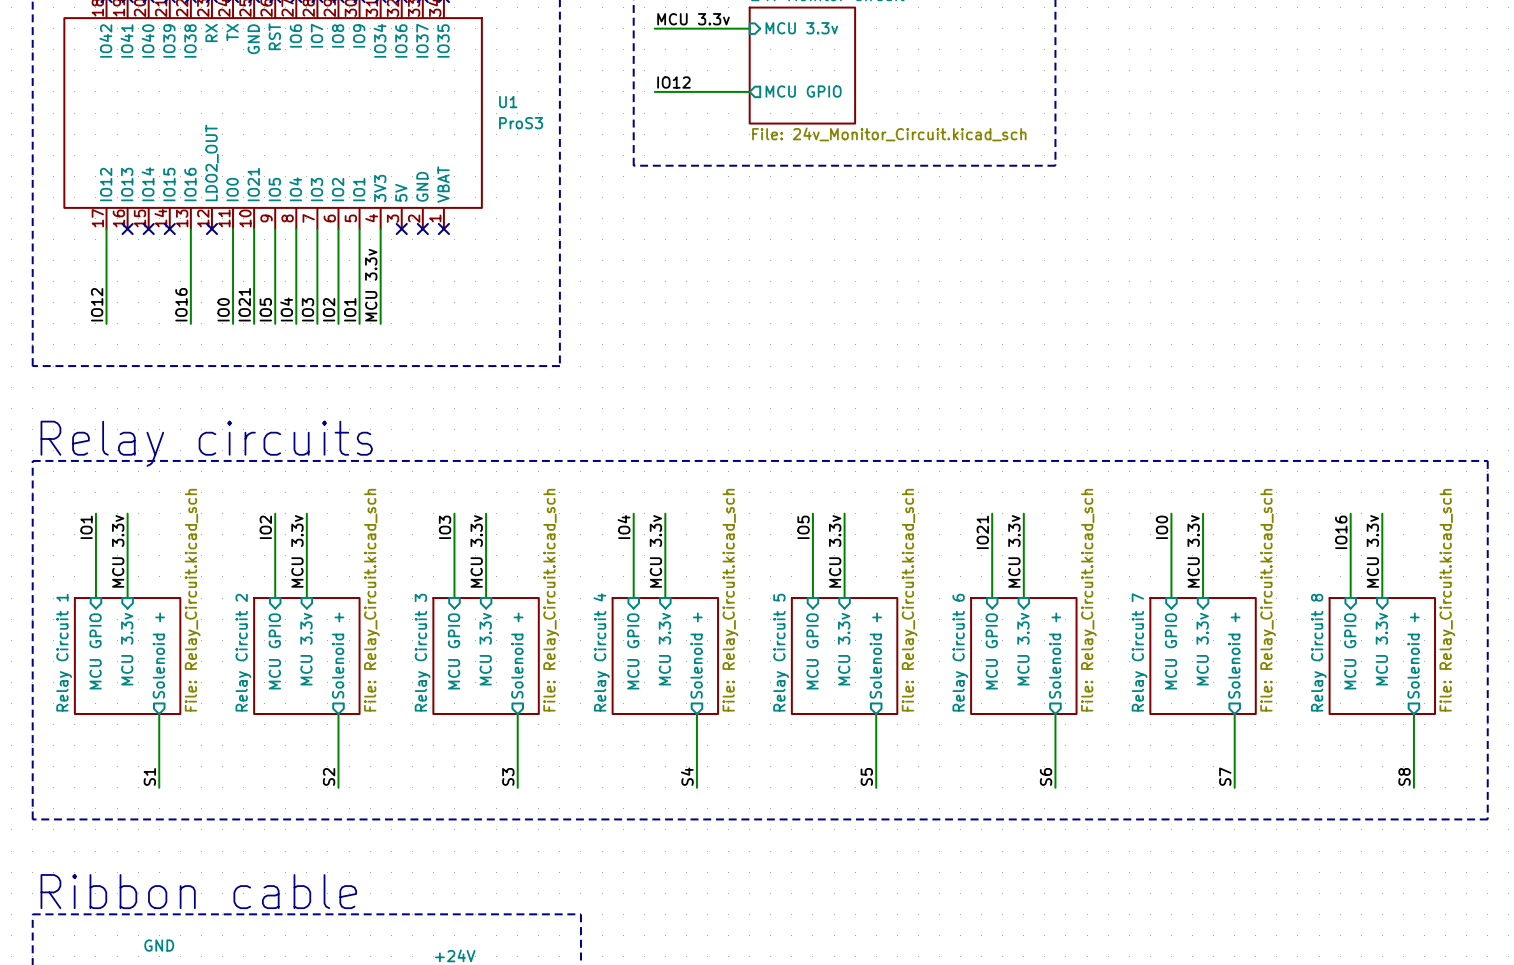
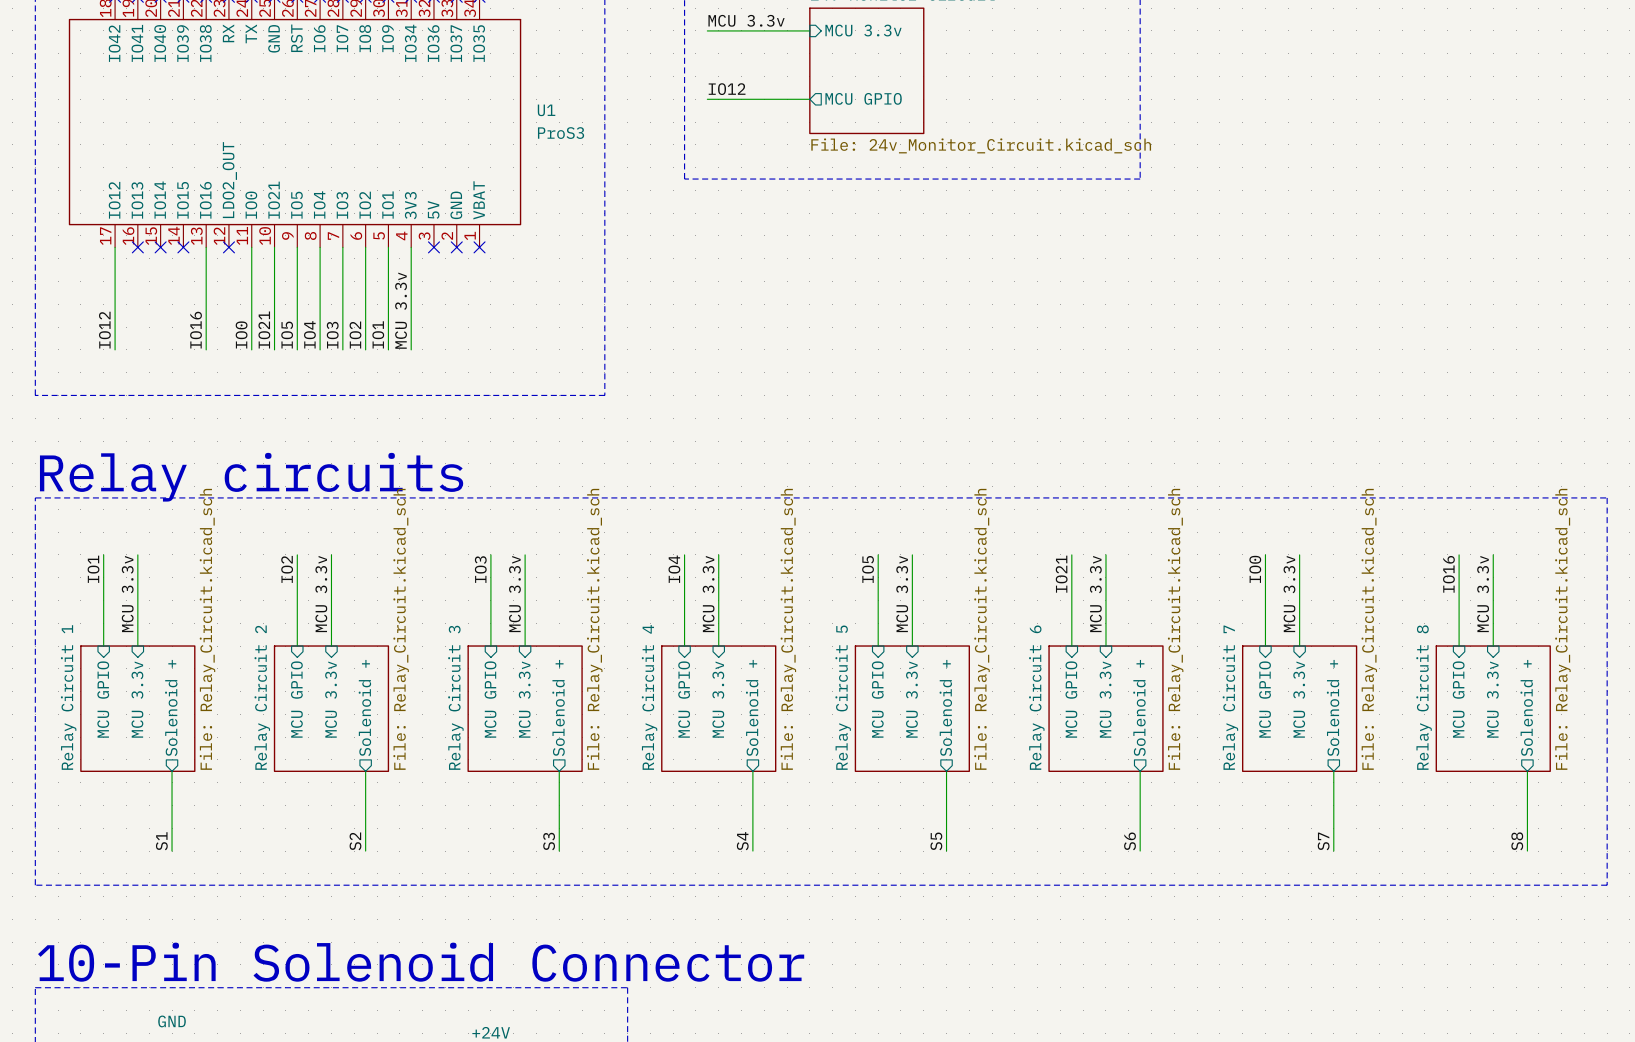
text: Ribbon cable (198, 891) -> 10-Pin Solenoid Connector (421, 962)

